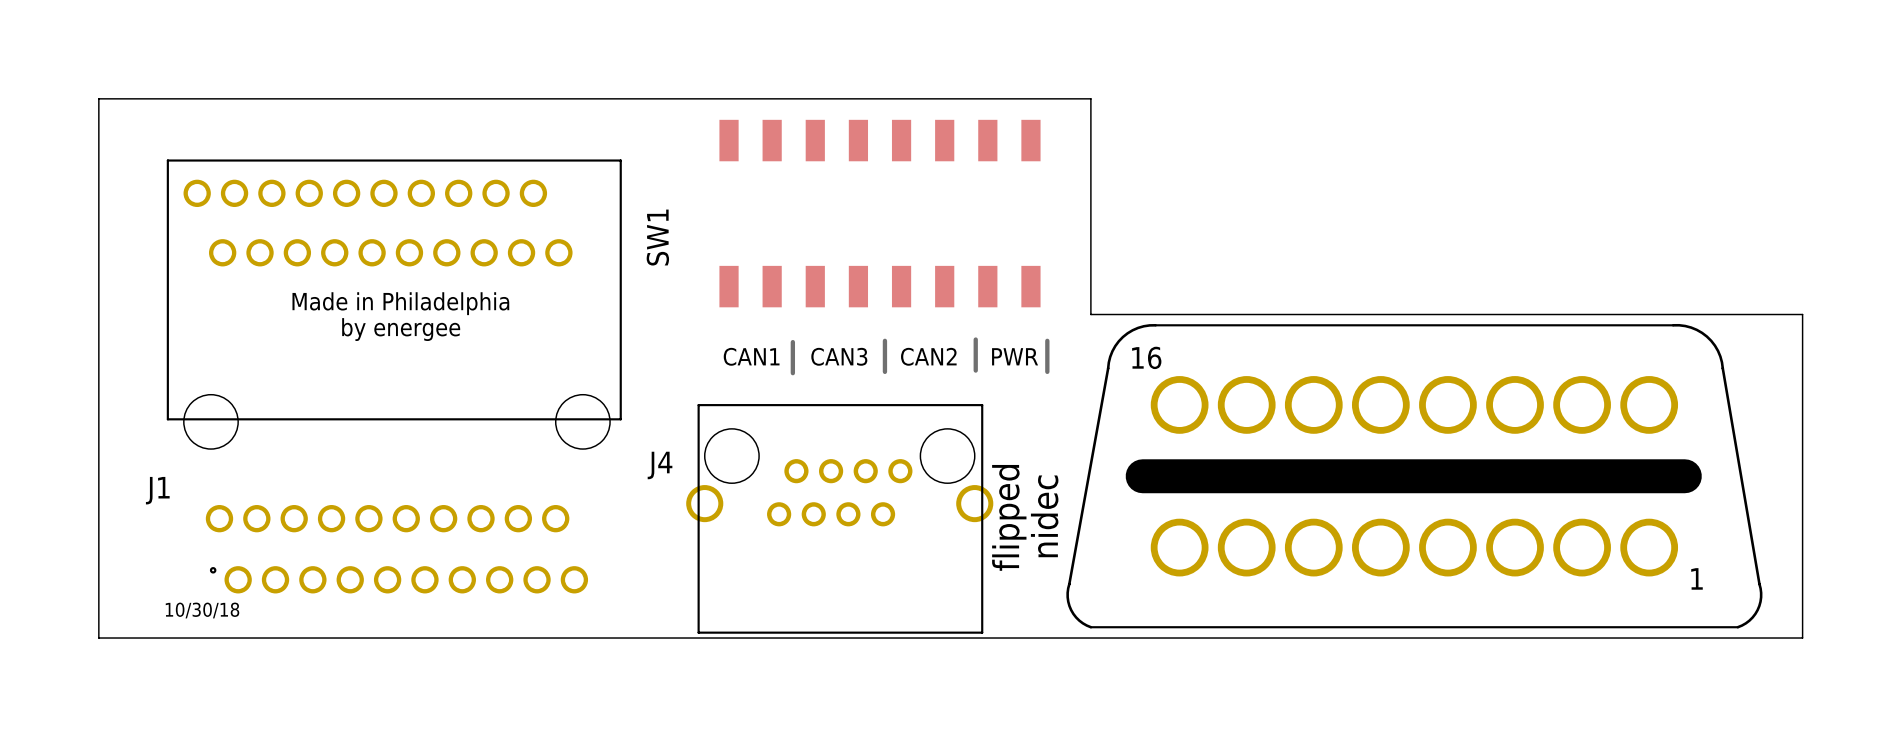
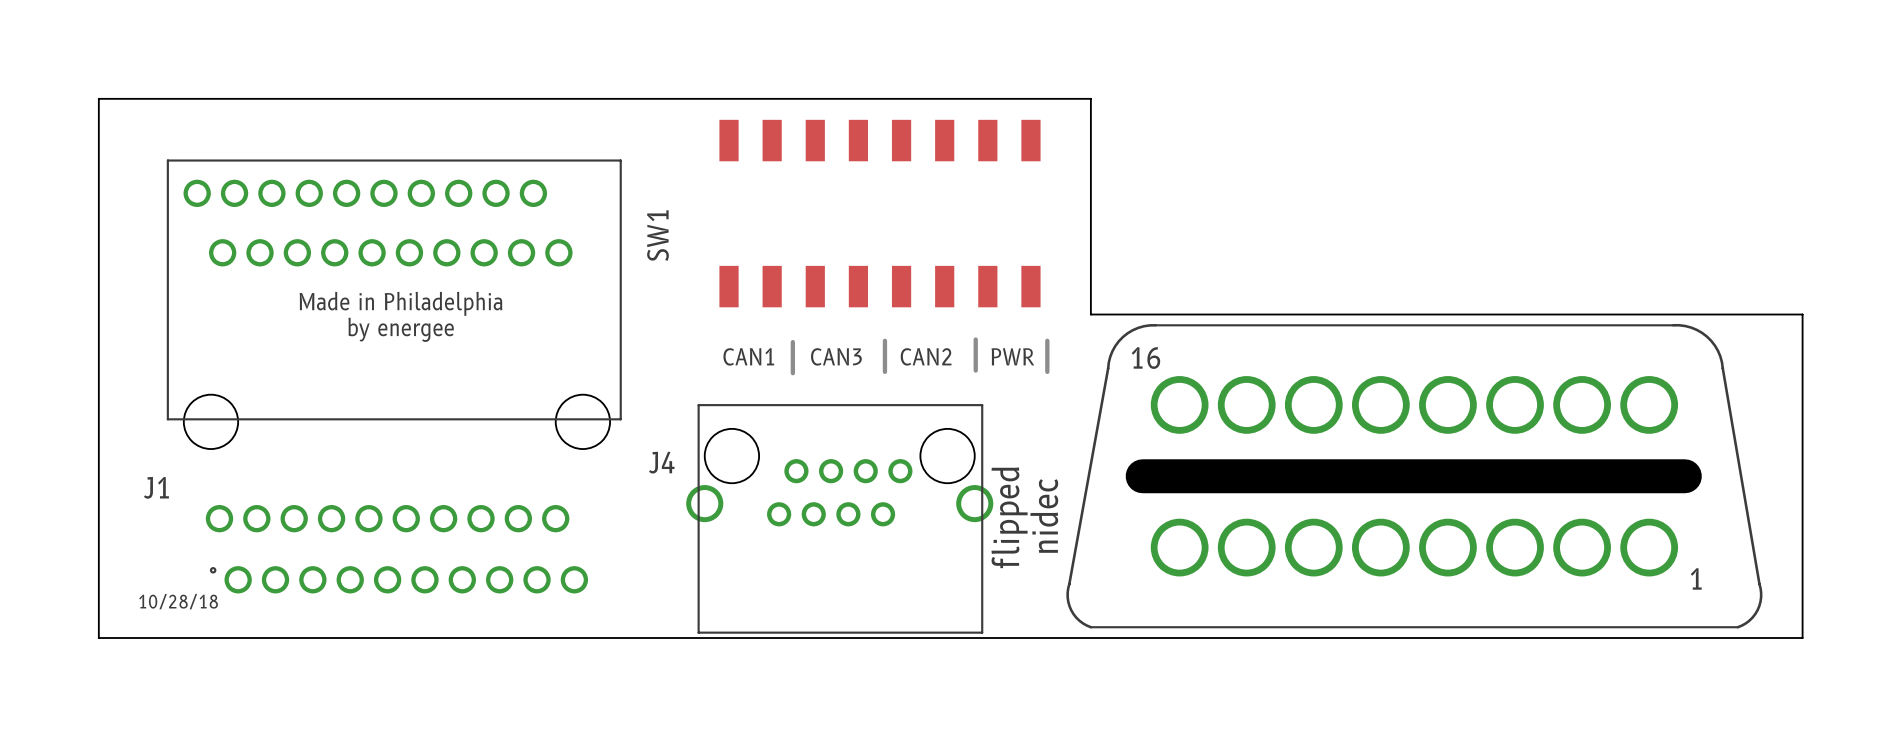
text: 10/30/18 (202, 610) -> 10/28/18 (178, 601)

